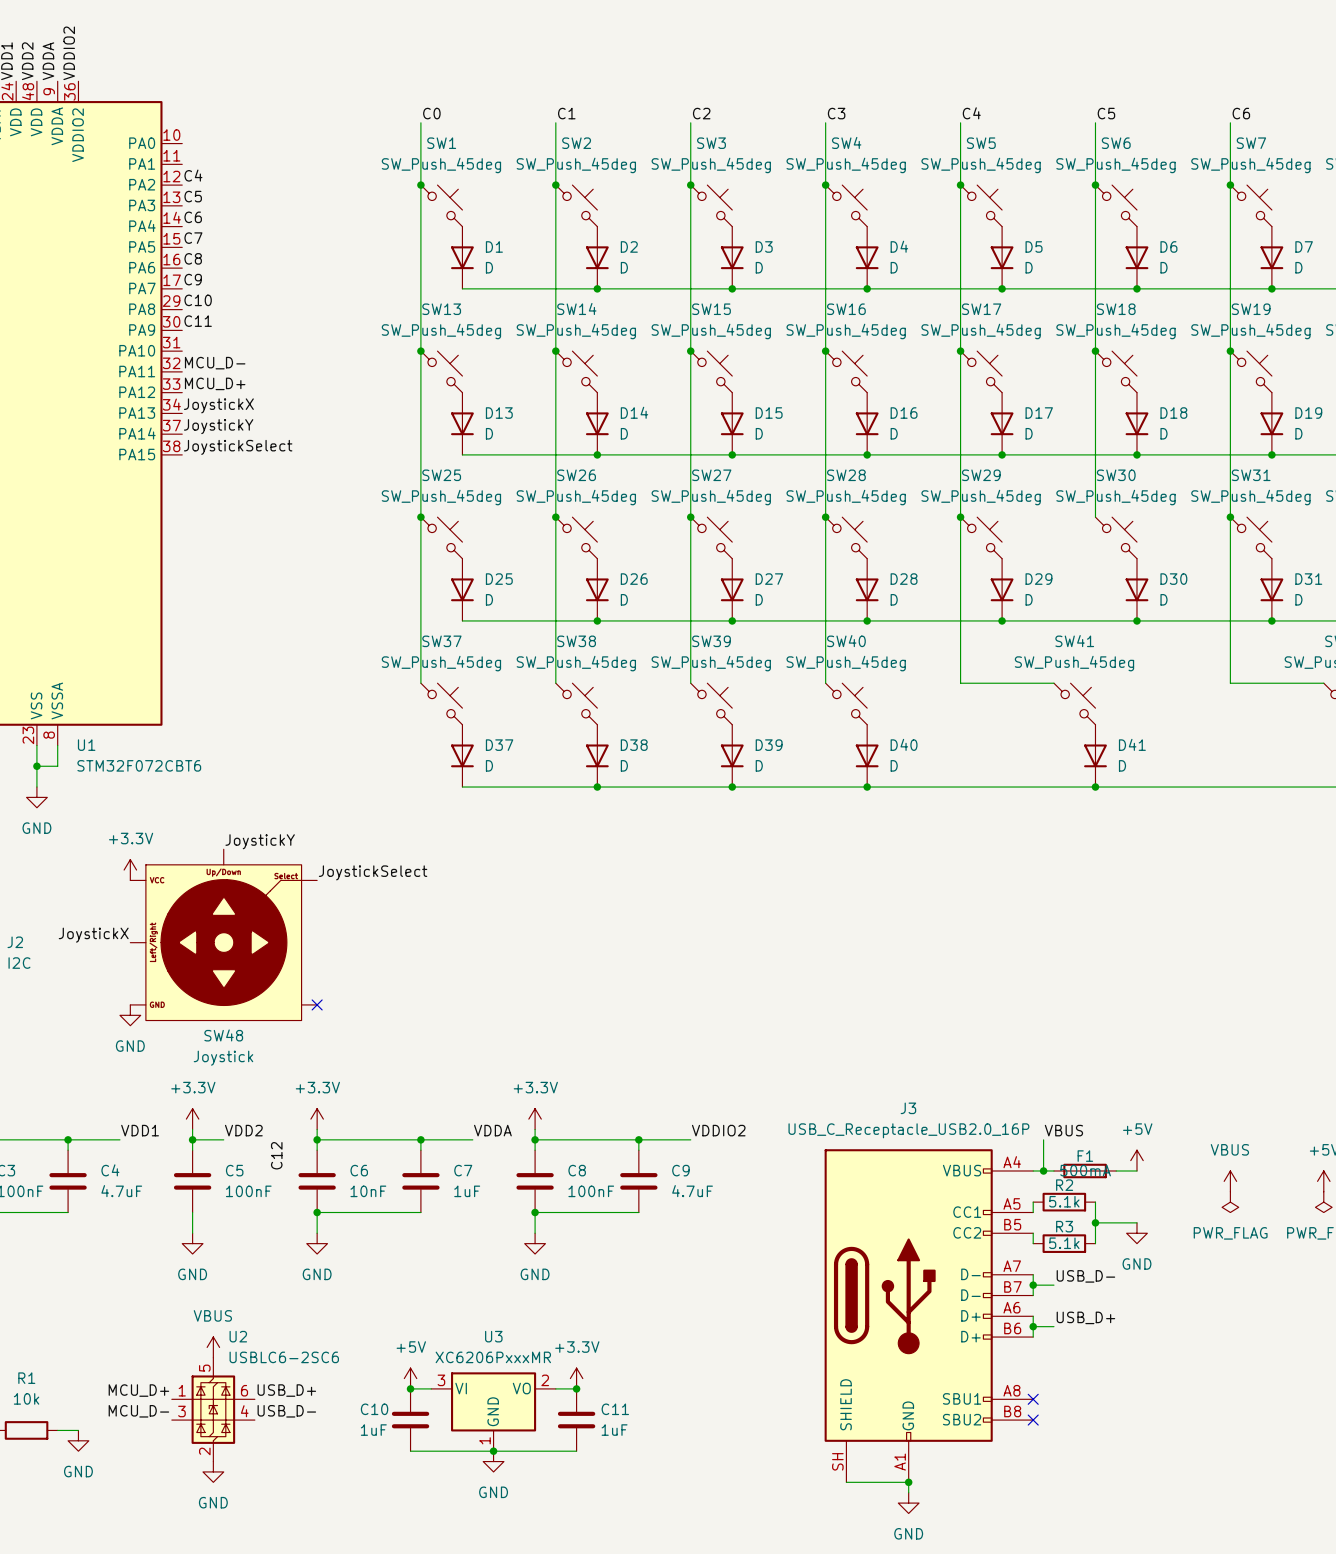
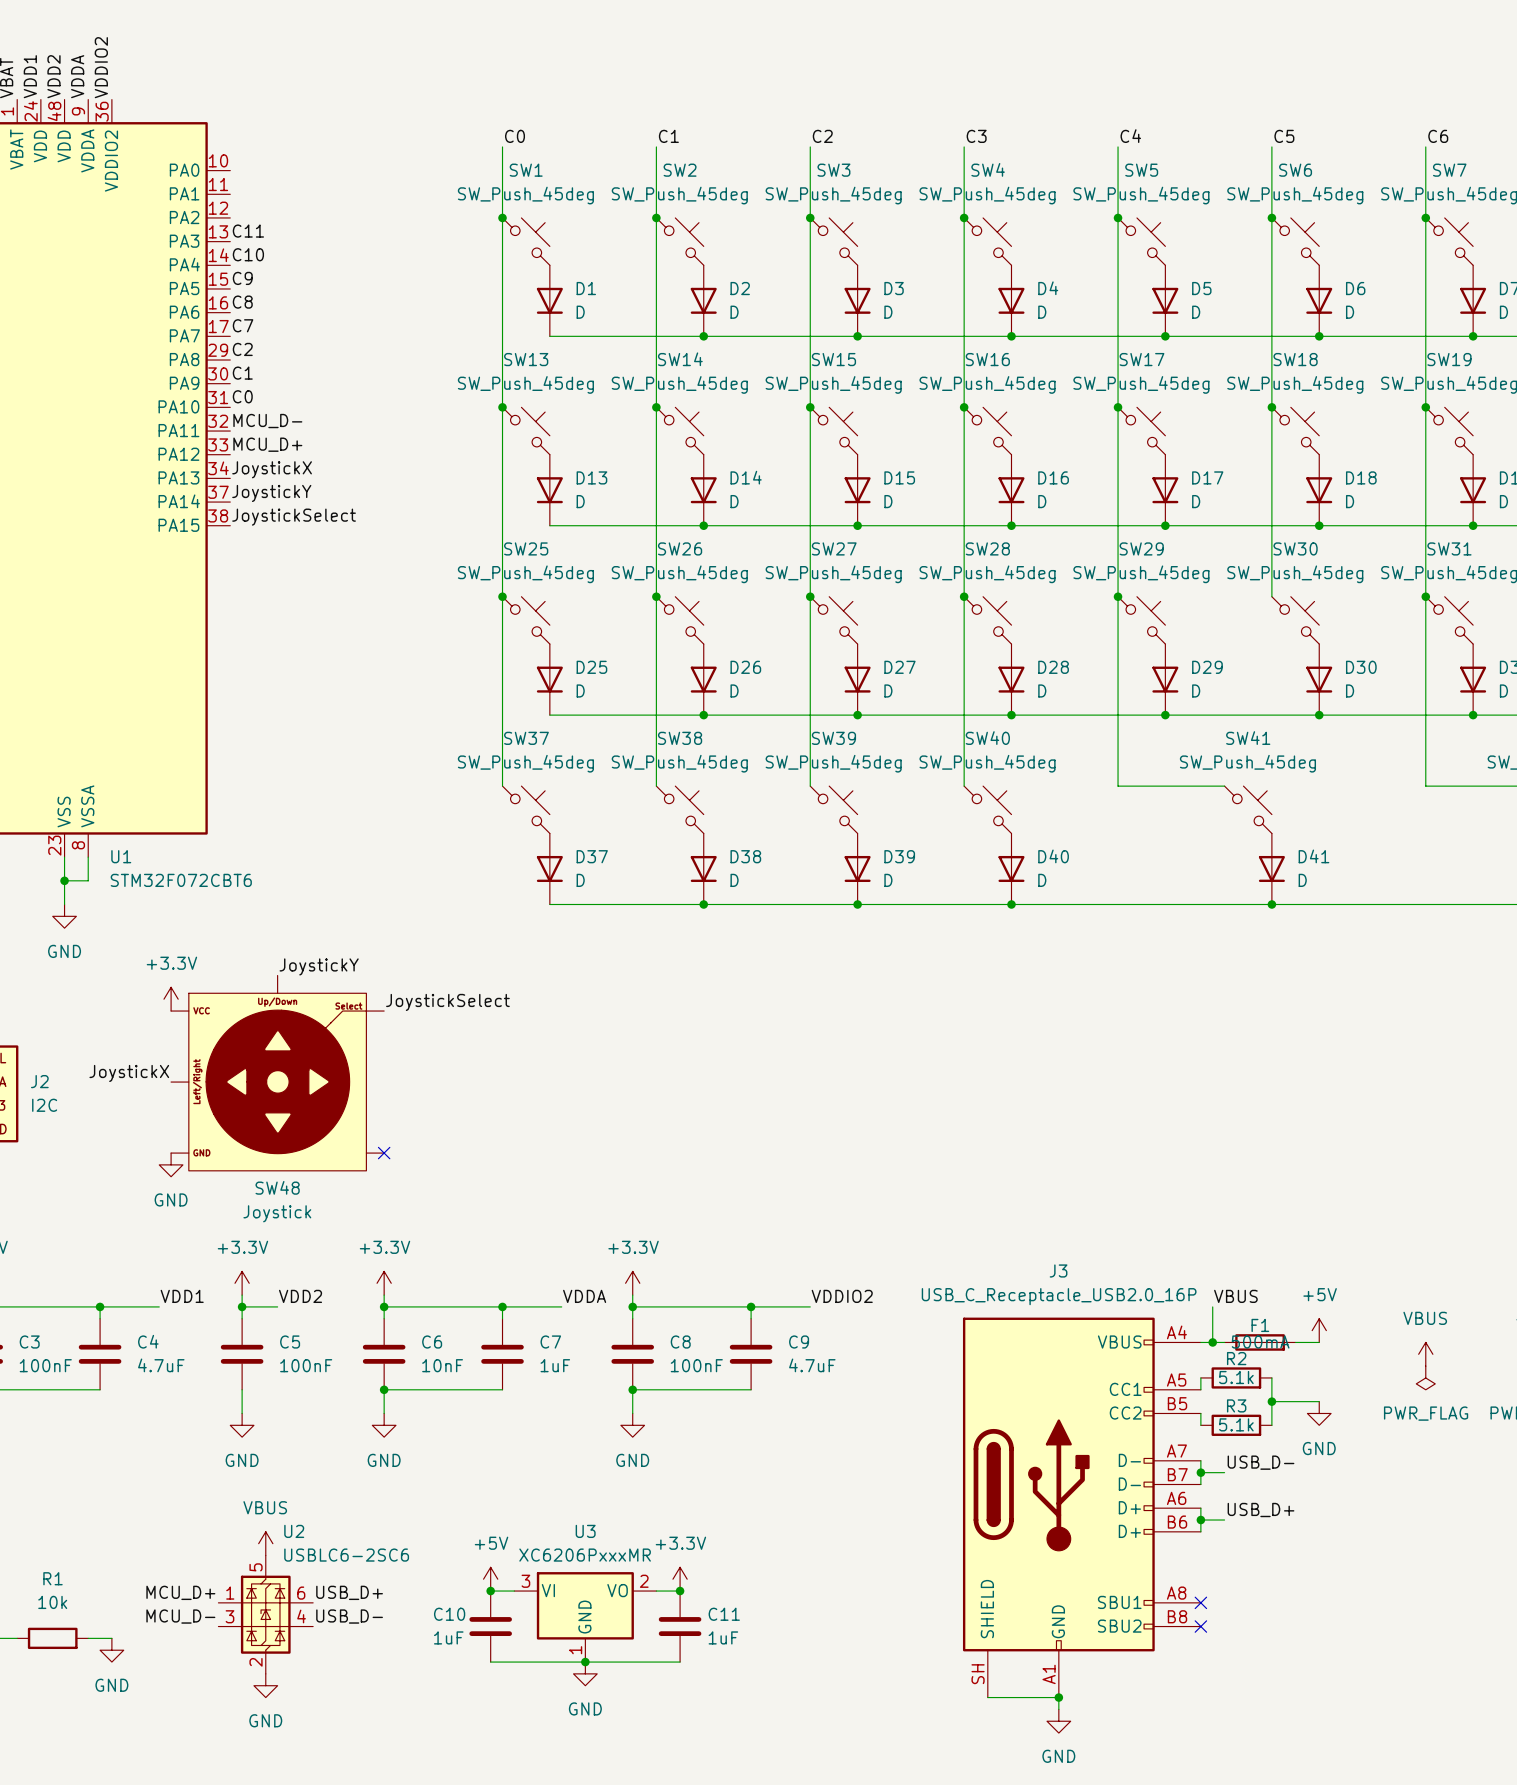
label: C4 (193, 175) -> none
label: C5 (193, 196) -> C11 (248, 231)
label: C6 (193, 217) -> C10 (248, 254)
label: C7 (193, 238) -> C9 (242, 278)
label: C9 (193, 279) -> C7 (243, 325)
label: C10 (198, 300) -> C2 (242, 349)
label: C11 (198, 321) -> C1 (242, 373)
label: none -> C0 (242, 396)
label: C12 (276, 1155) -> none

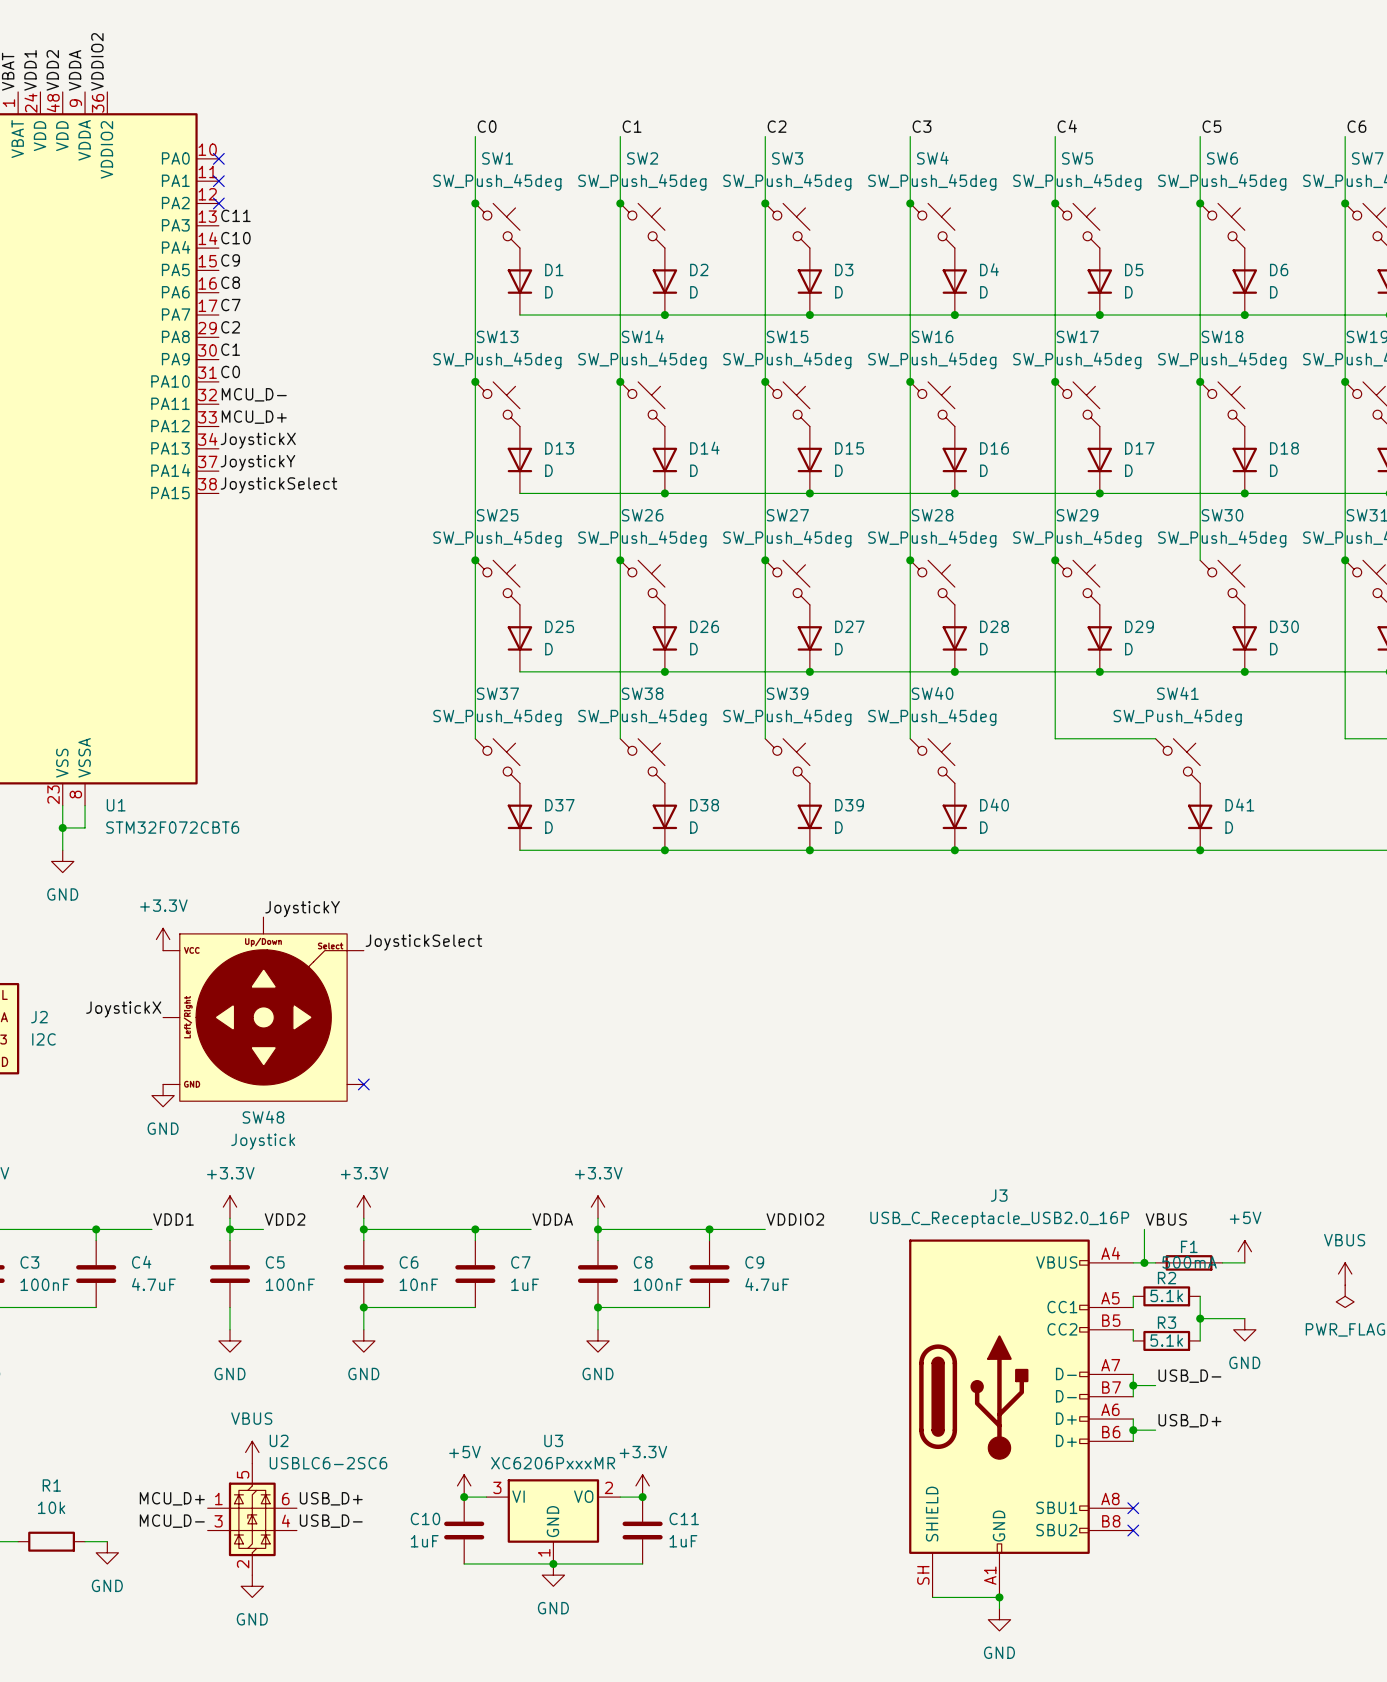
no-connect mark: none -> (218, 158)
no-connect mark: none -> (218, 181)
no-connect mark: none -> (218, 203)

